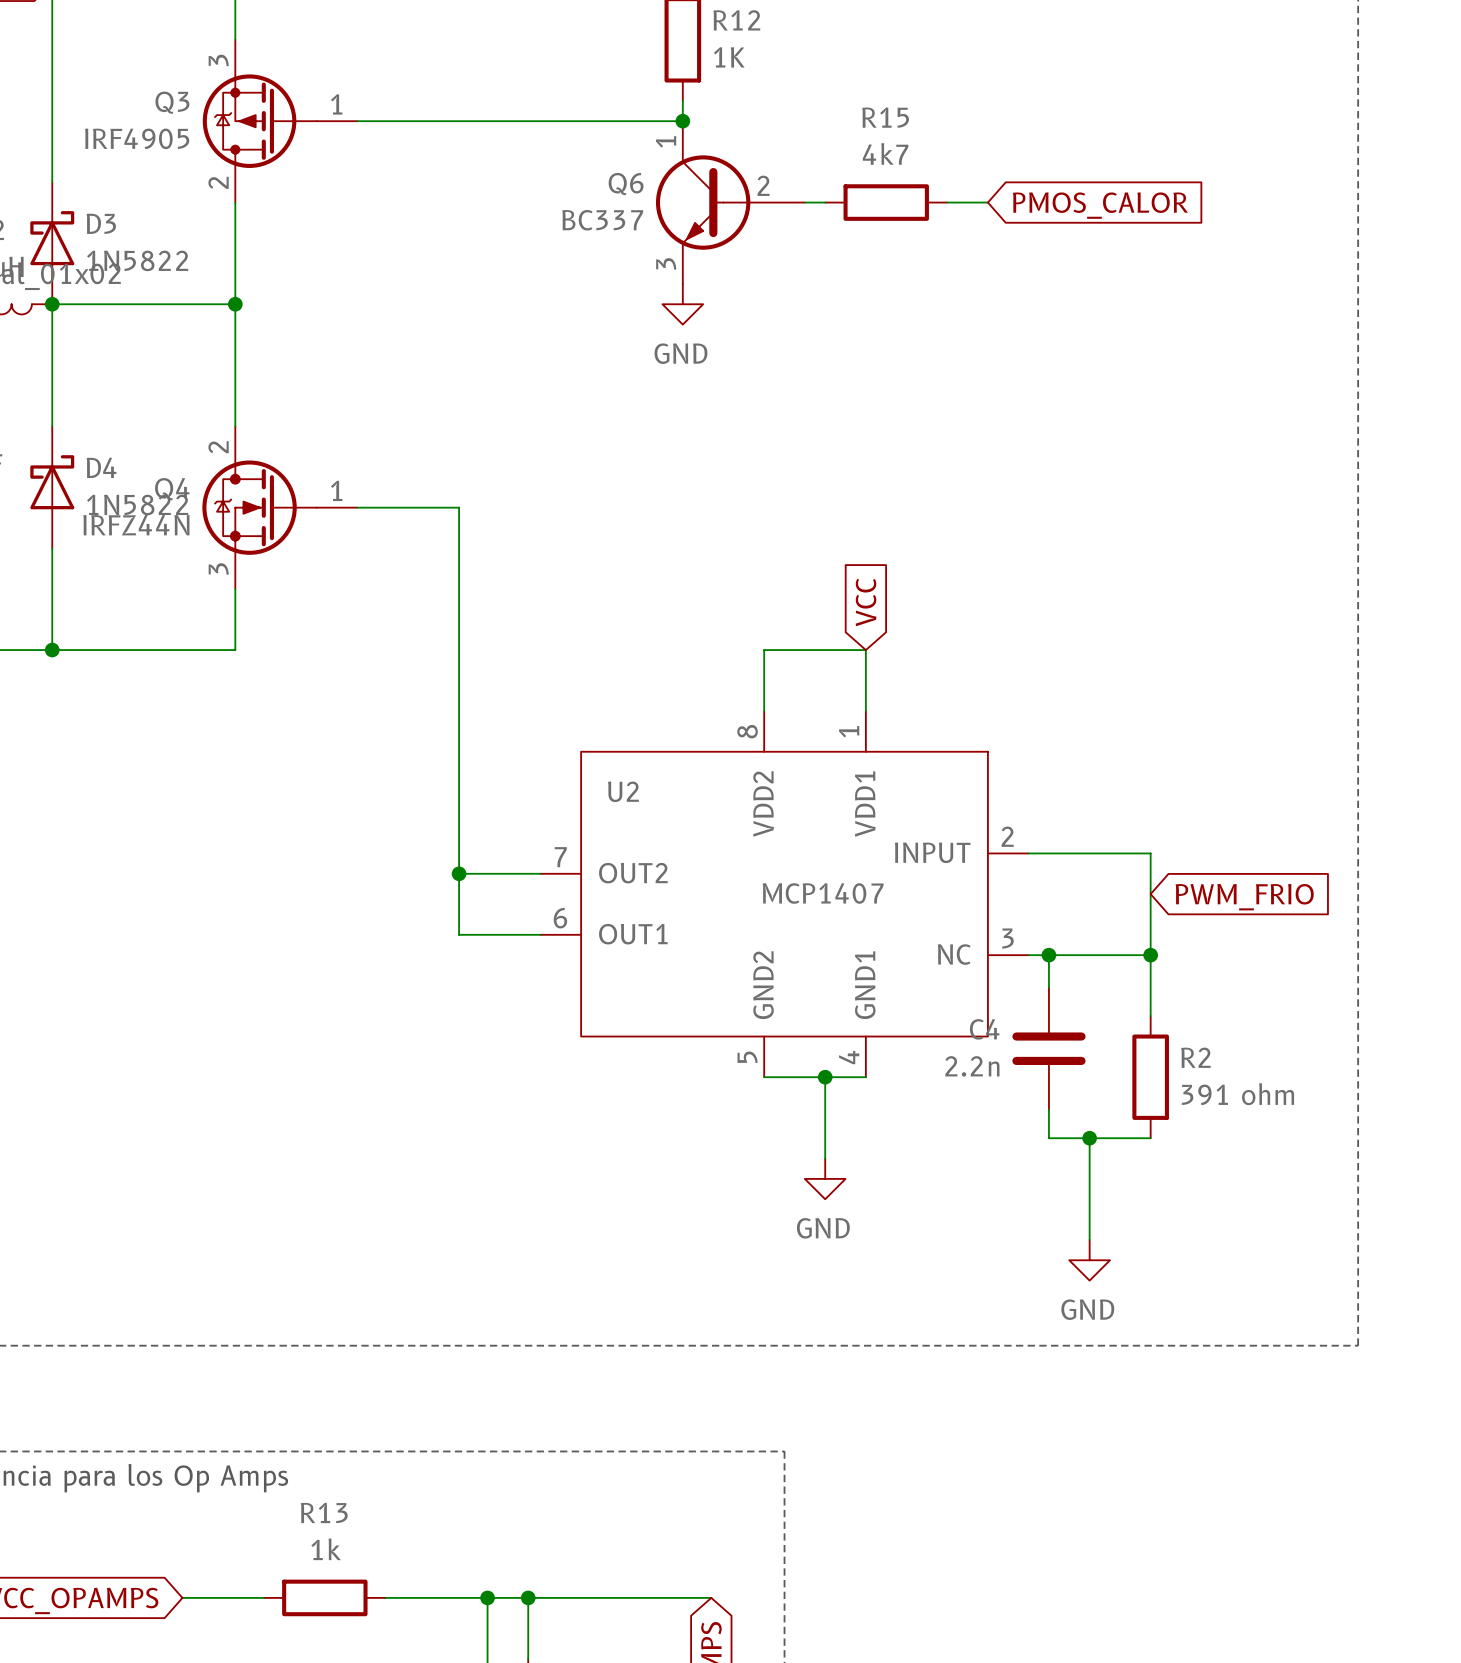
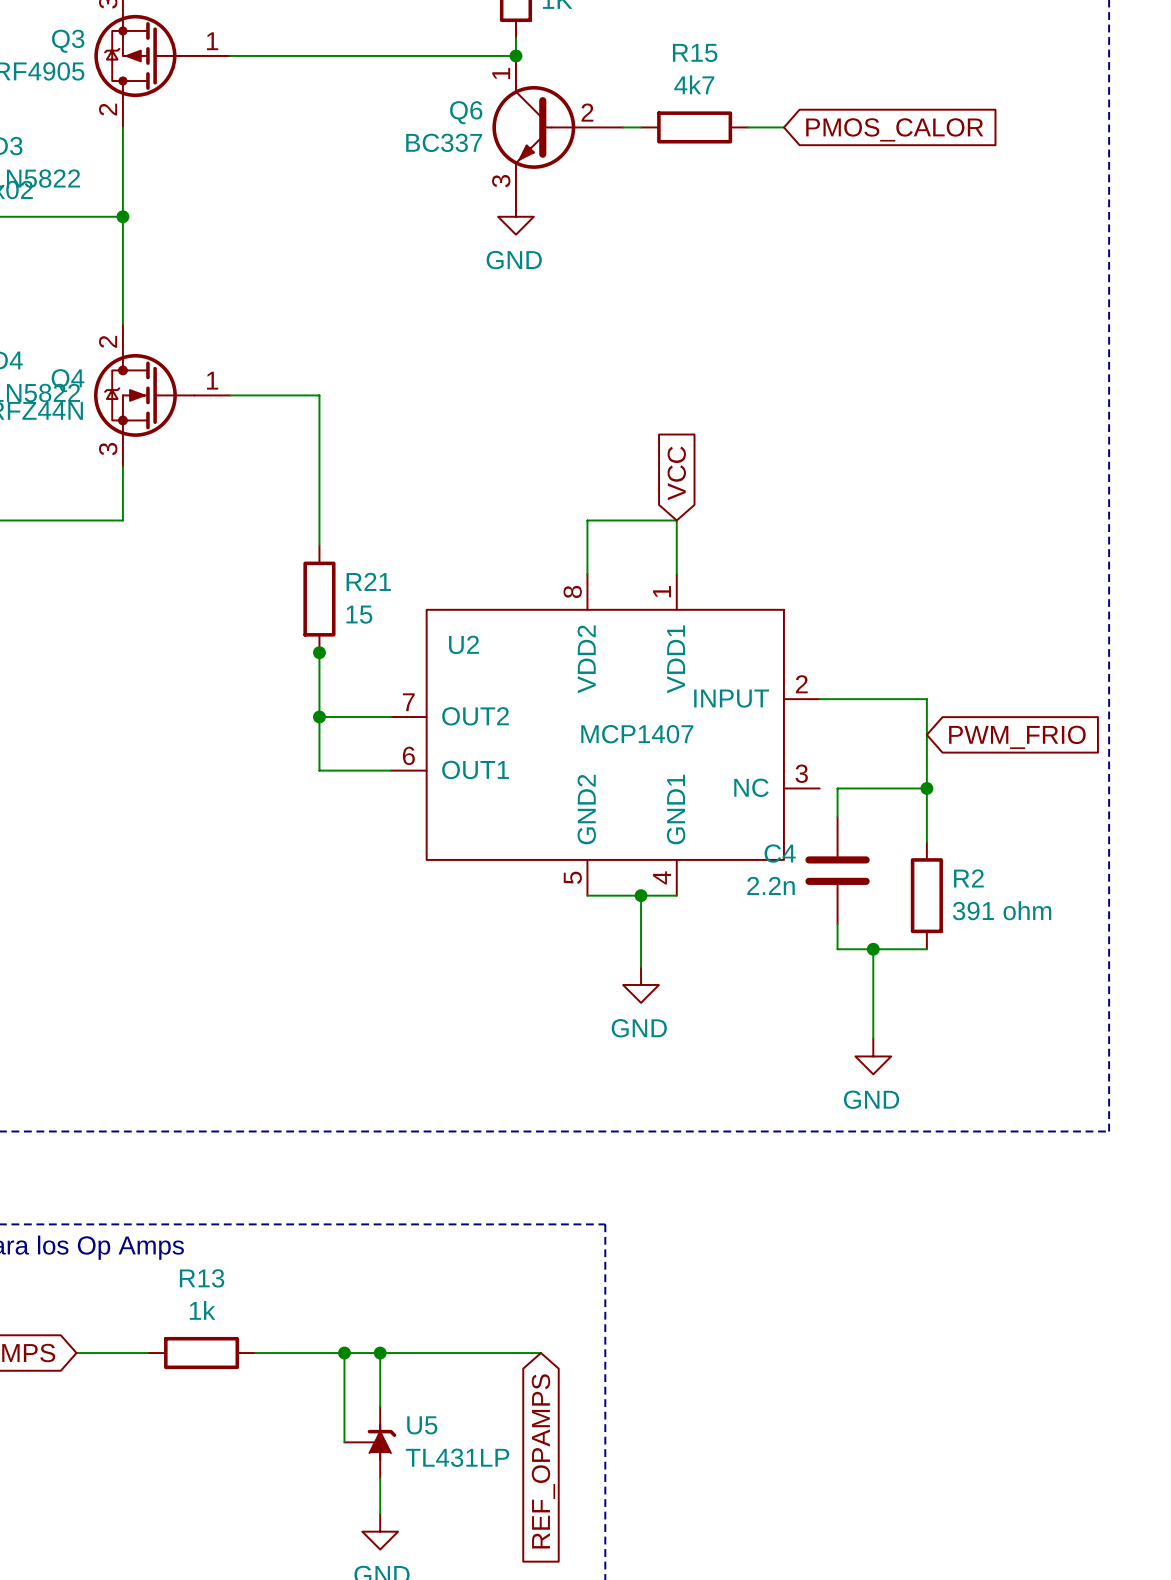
wire: (459, 678) (459, 796) -> none
R21: none -> 15 (319, 599)
junction: none -> (319, 652)
wire: (1028, 955) (1048, 955) -> none
junction: (1048, 955) -> none

